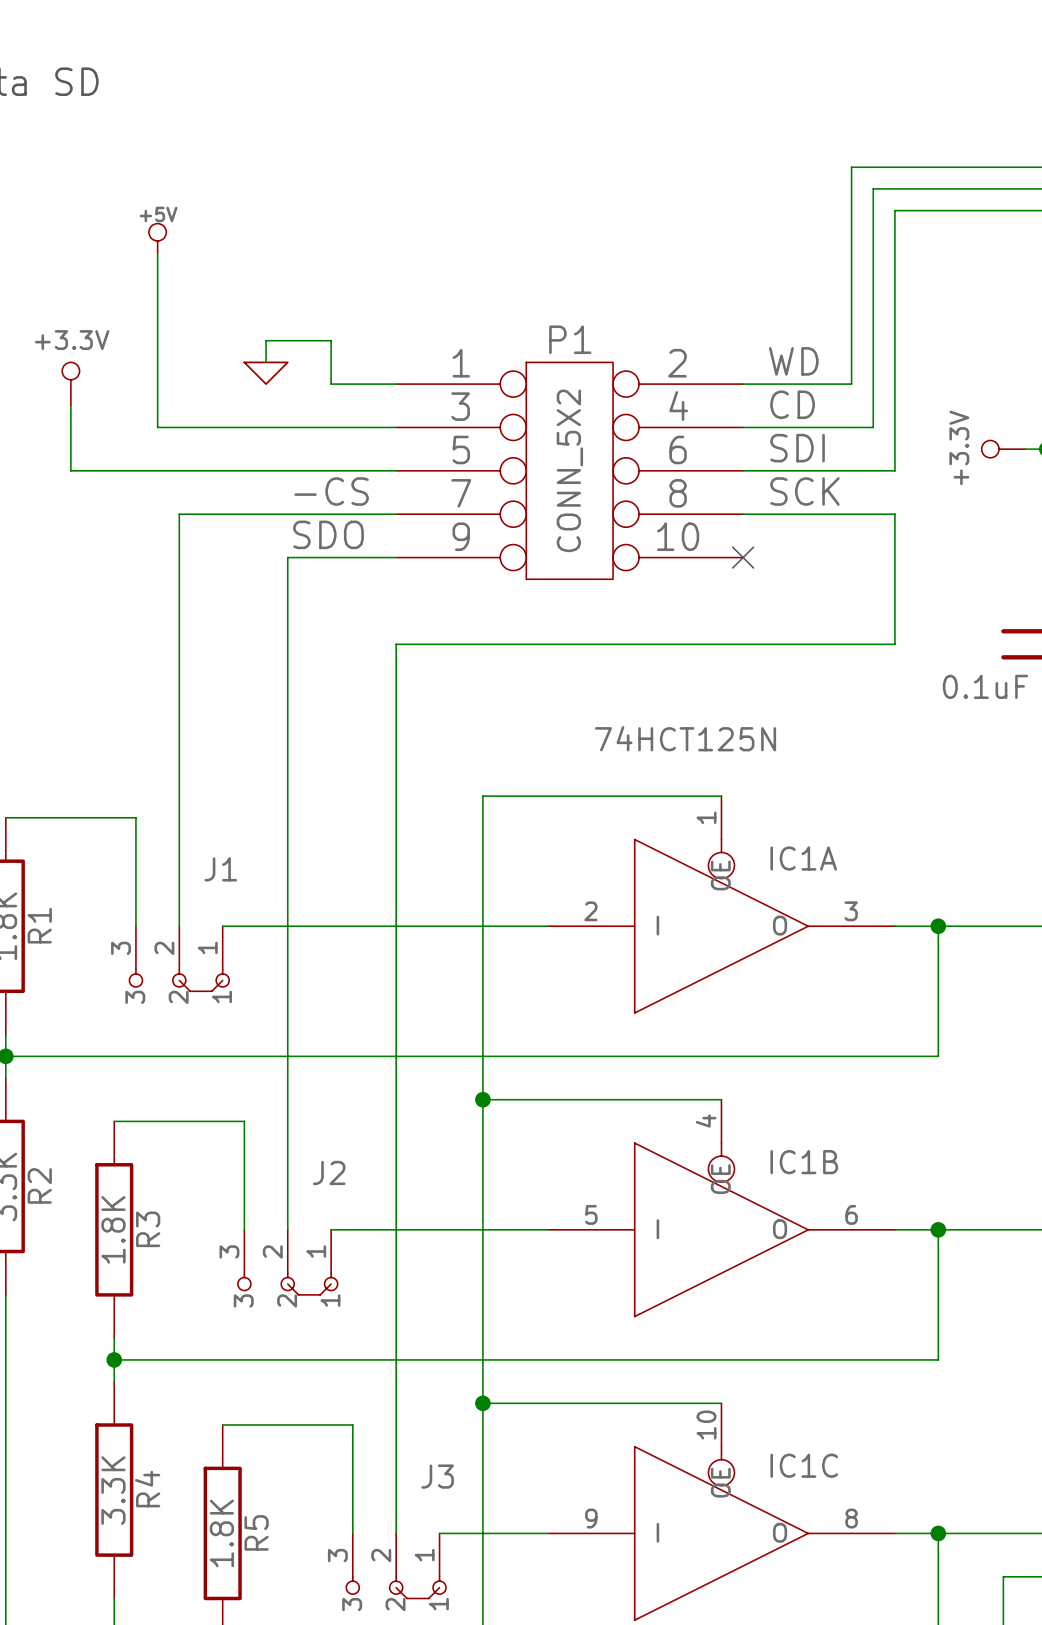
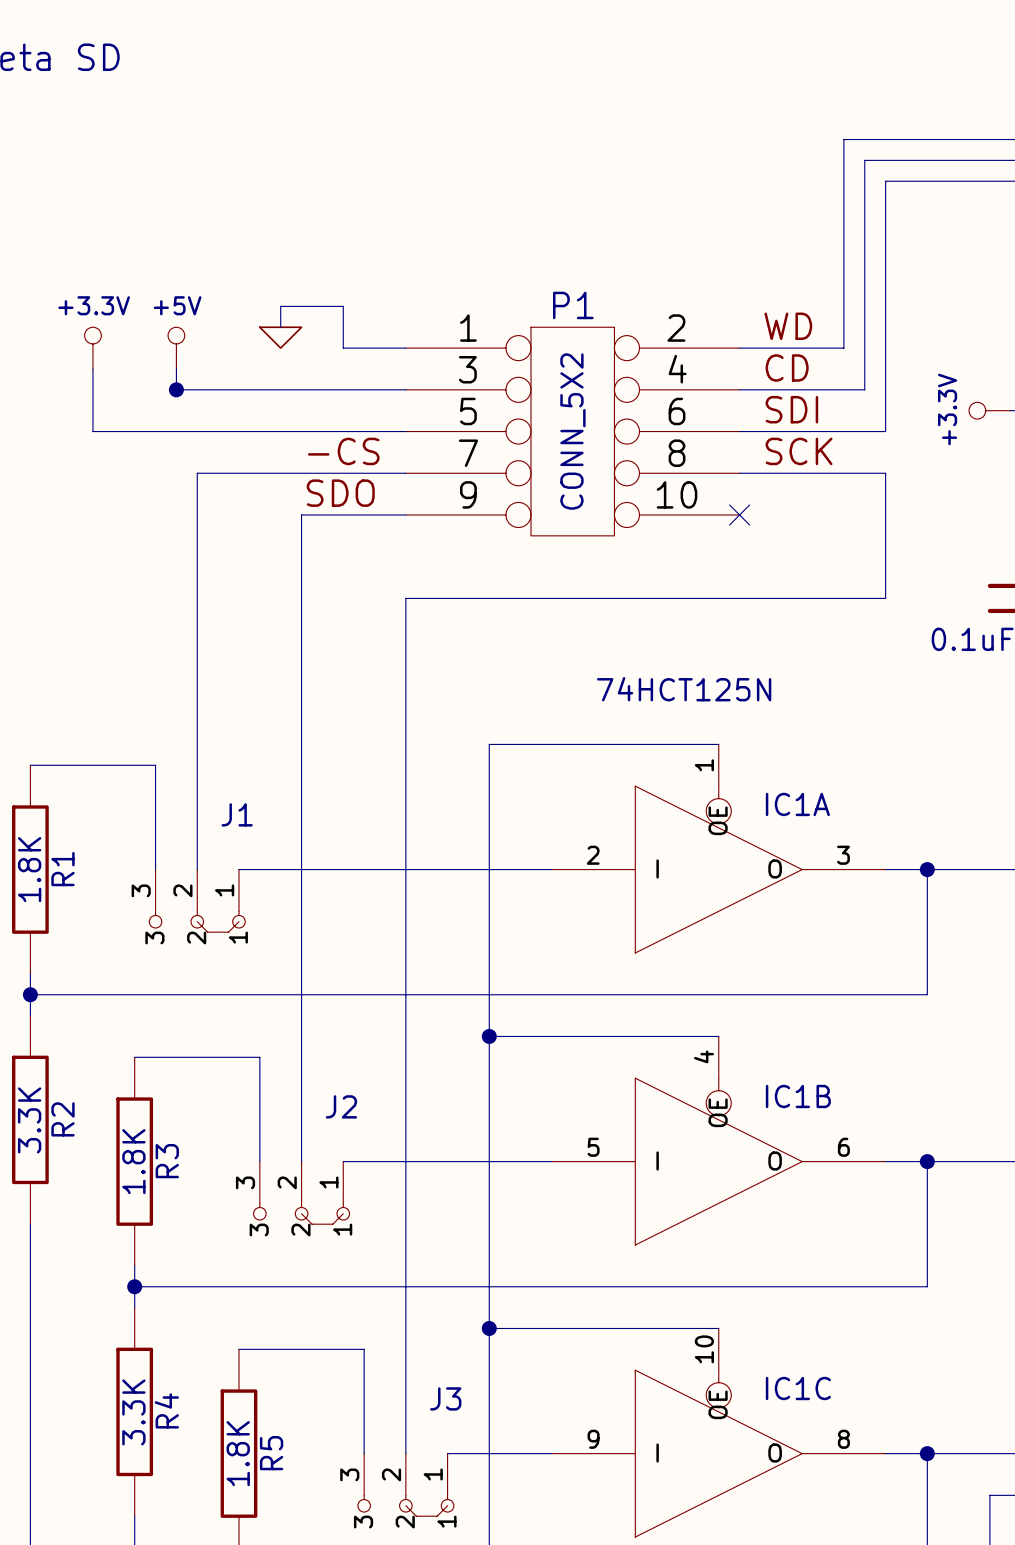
power symbol: +5V (157, 238) -> none
wire: (157, 253) (157, 405) -> none
power symbol: none -> +5V (176, 348)
junction: none -> (176, 389)

